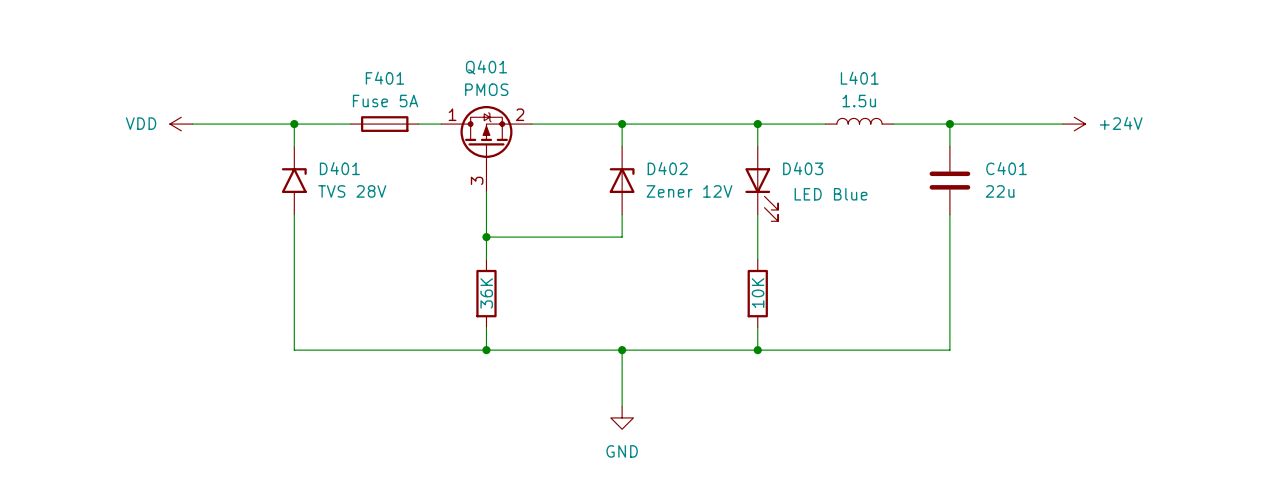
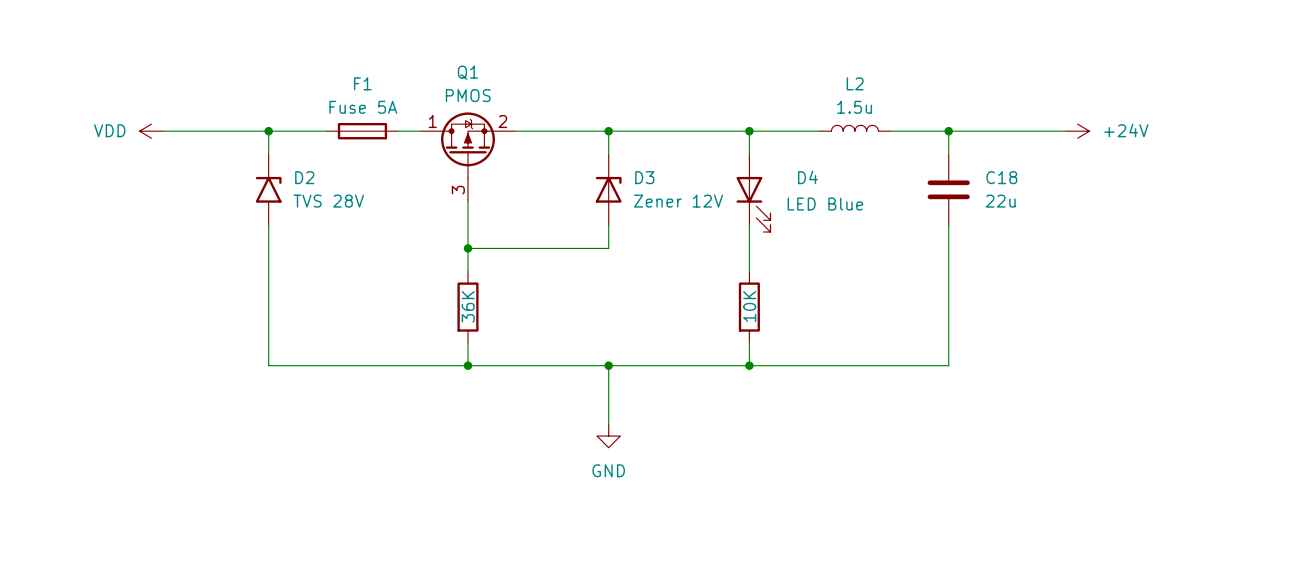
Q401 name: Q401 (486, 67) -> Q1 (467, 72)
F401 name: F401 (385, 78) -> F1 (362, 83)
L401 name: L401 (859, 78) -> L2 (855, 83)
D401 name: D401 (339, 168) -> D2 (304, 177)
D402 name: D402 (667, 168) -> D3 (644, 177)
D403 name: D403 (803, 168) -> D4 (807, 177)
C401 name: C401 (1006, 168) -> C18 (1001, 177)

